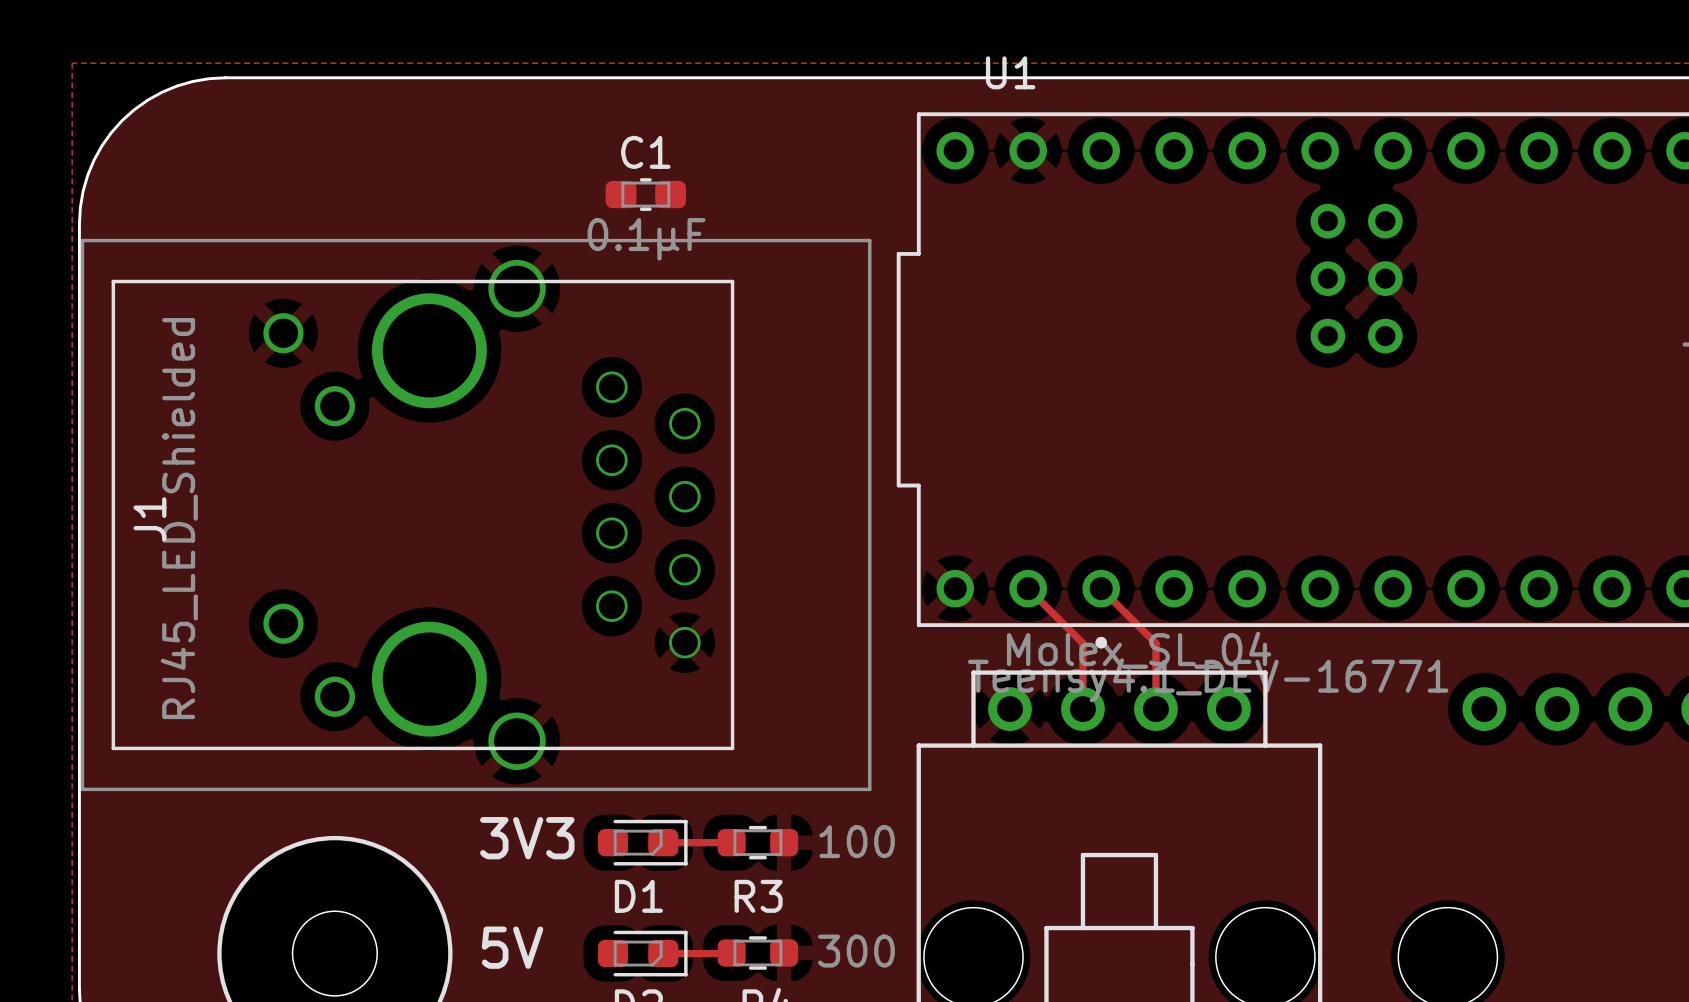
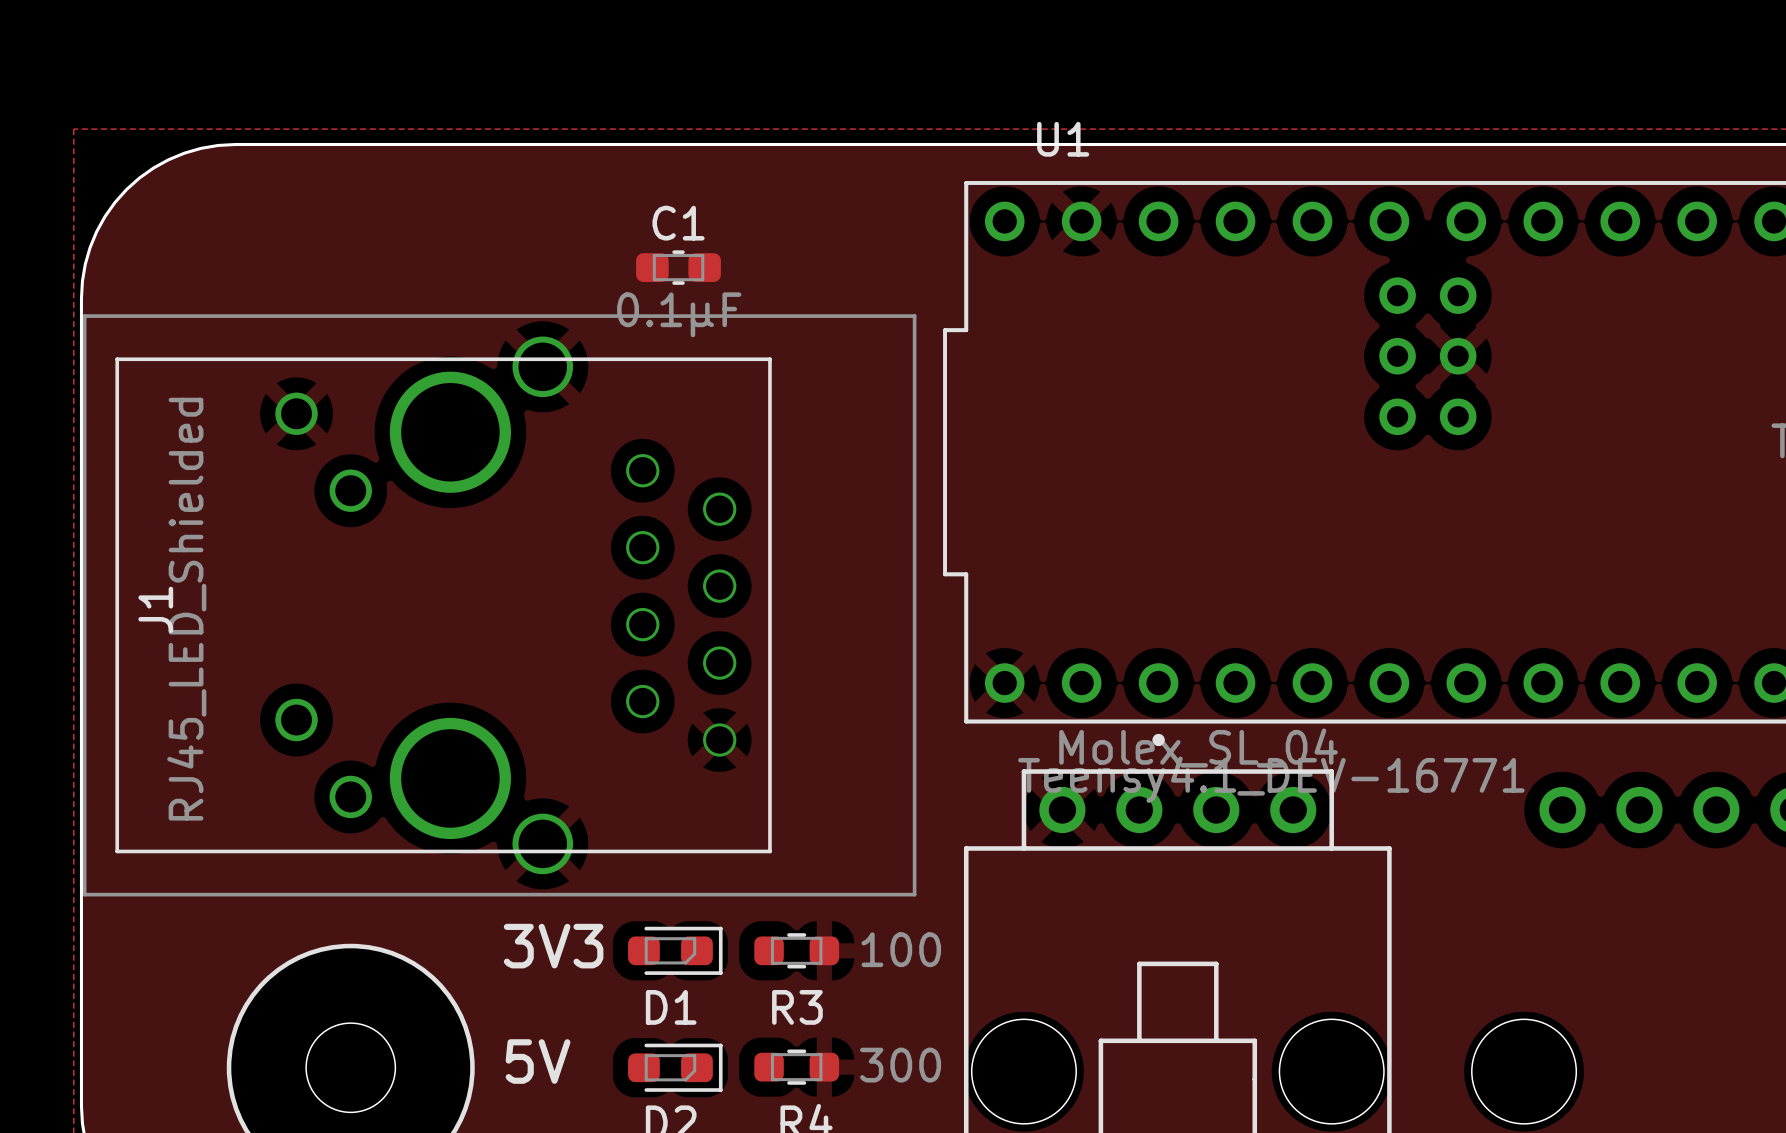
track: (1028, 588) (1082, 643) (1082, 709) -> none
track: (1101, 588) (1155, 643) (1155, 709) -> none
track: (663, 842) (731, 842) -> none
track: (731, 953) (663, 953) -> none

